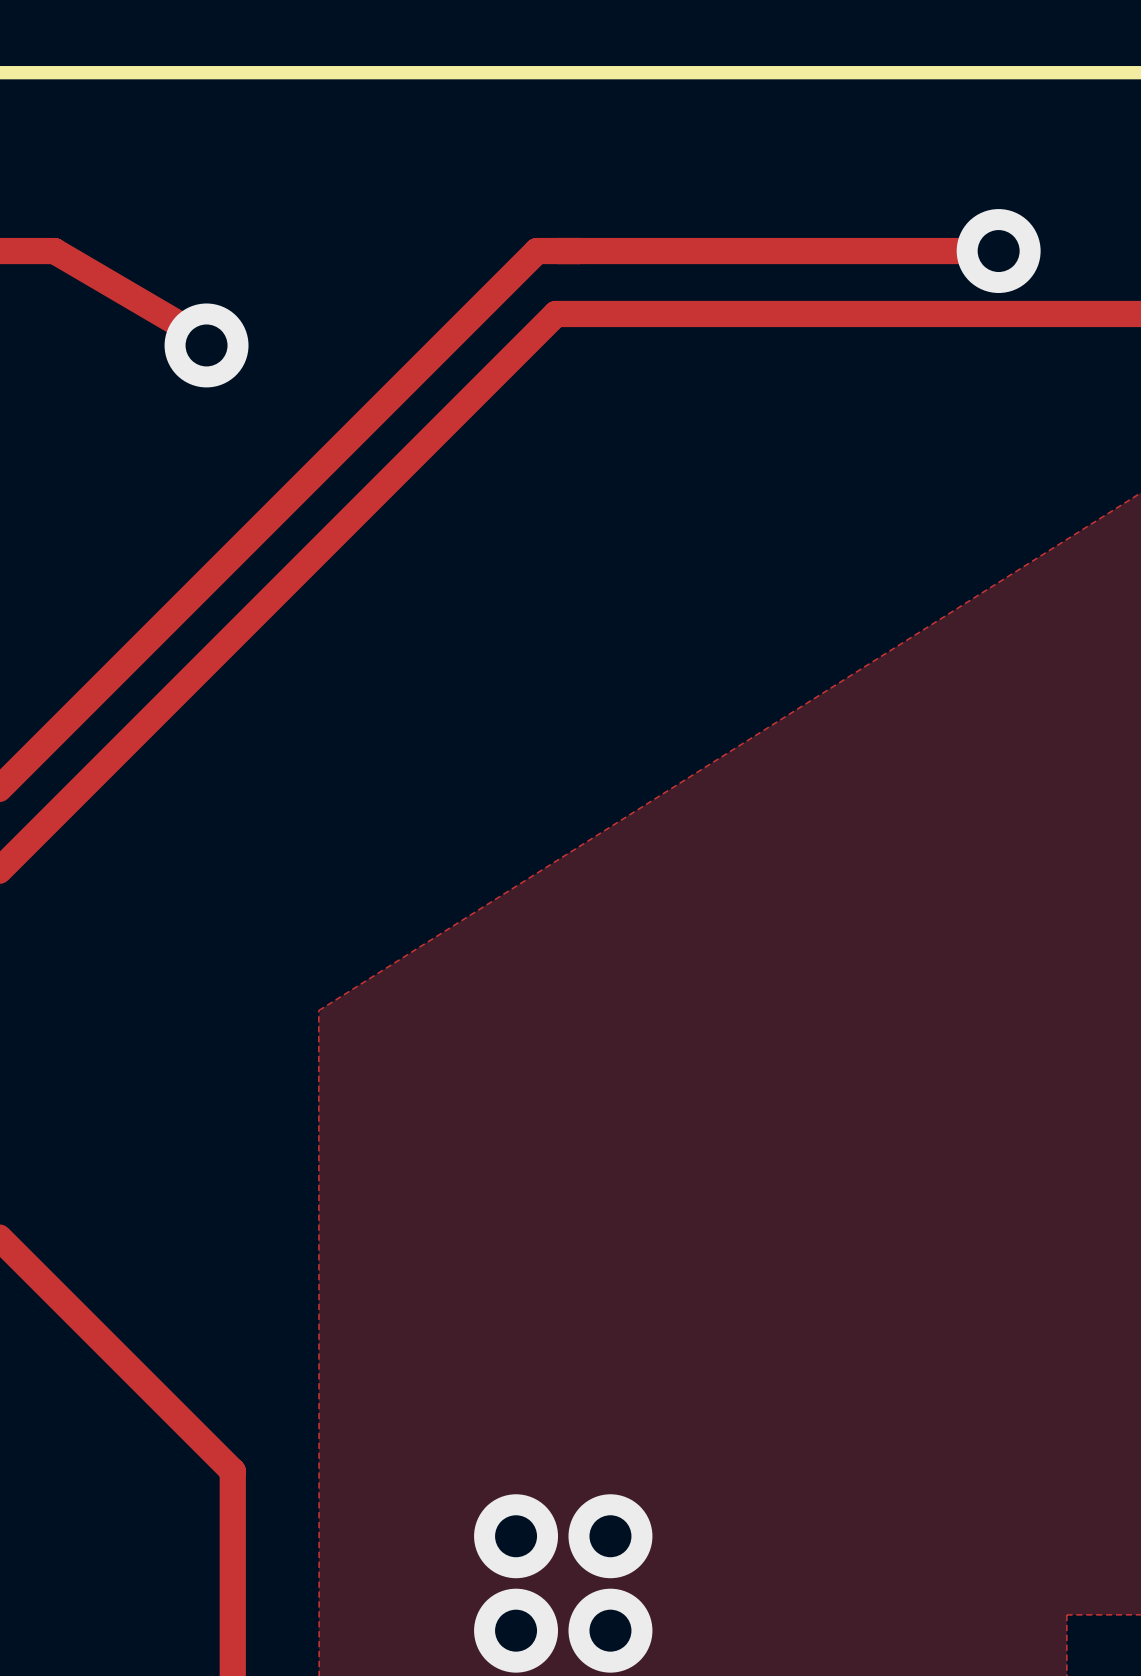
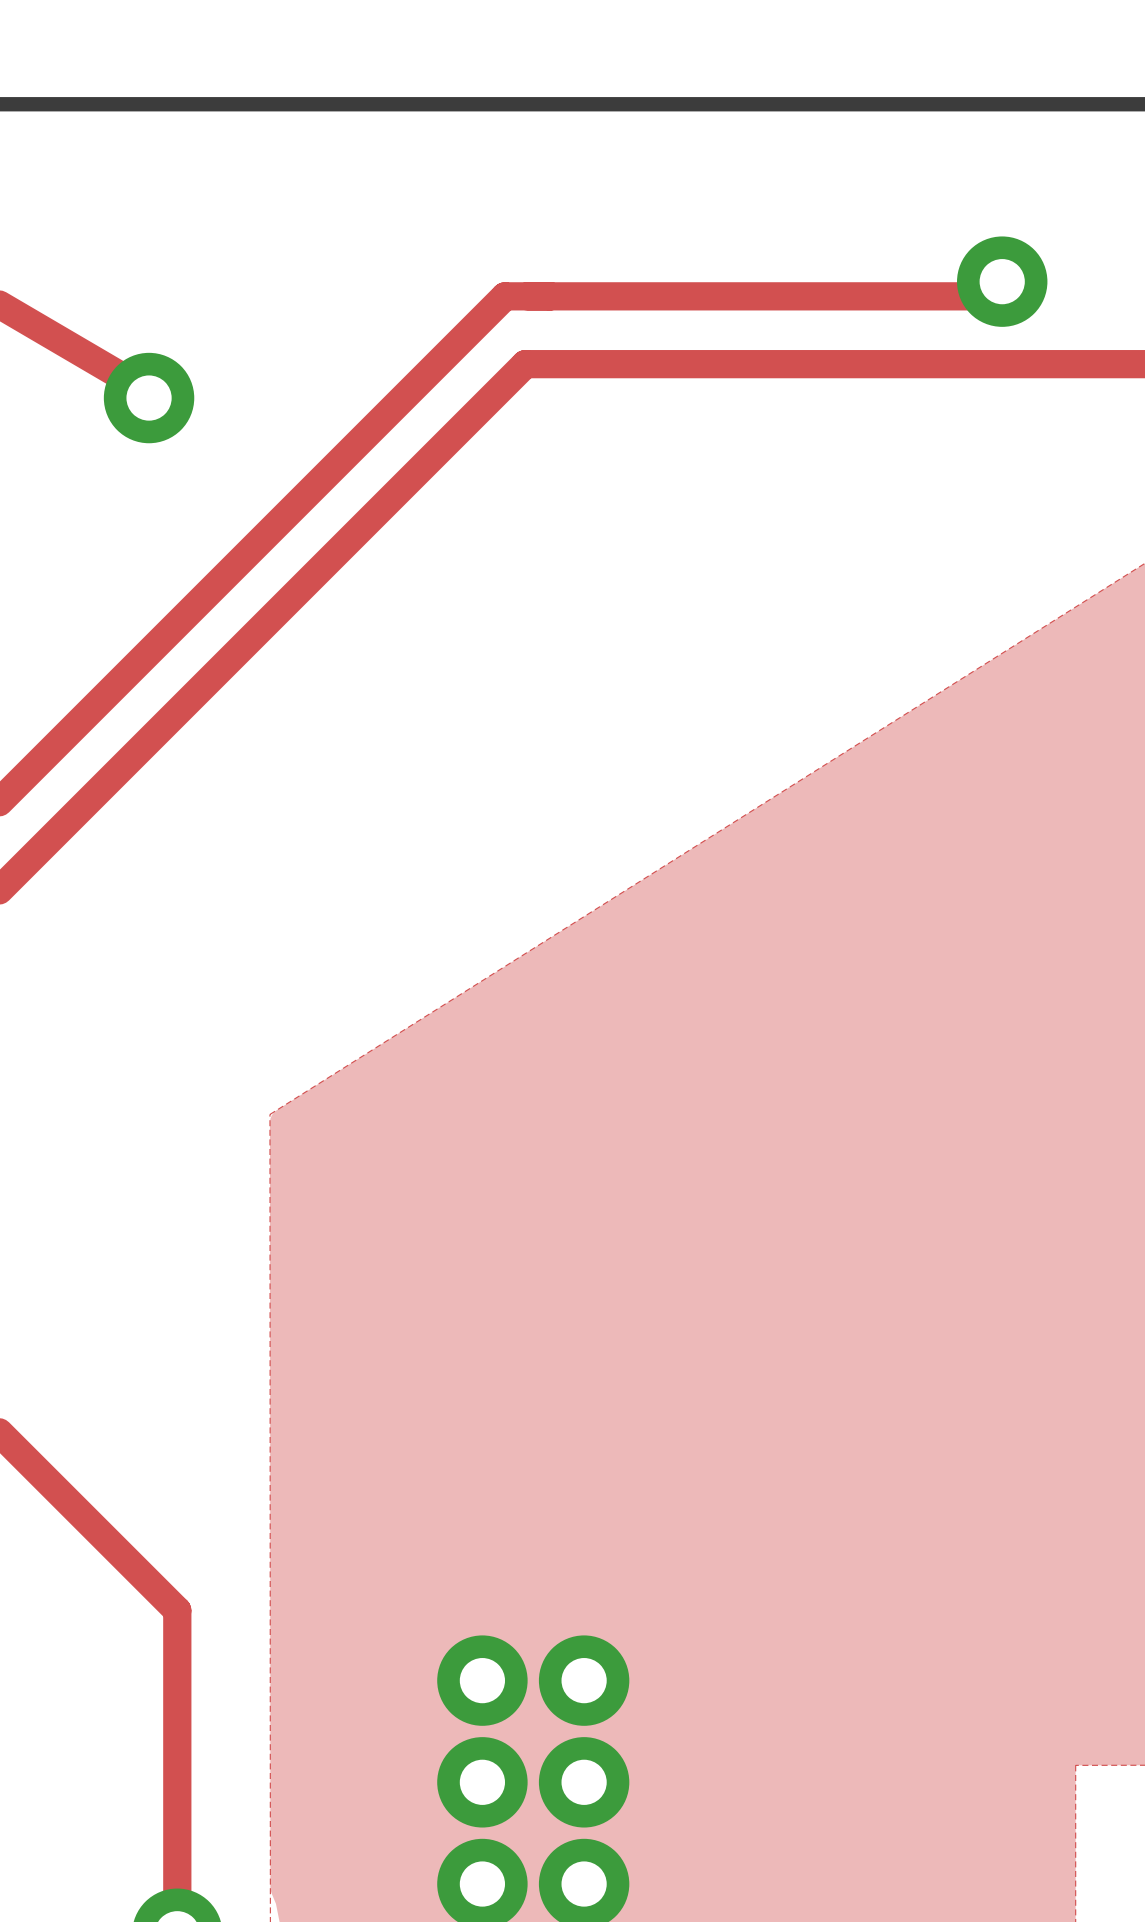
via position: (998, 251) -> (1002, 281)

